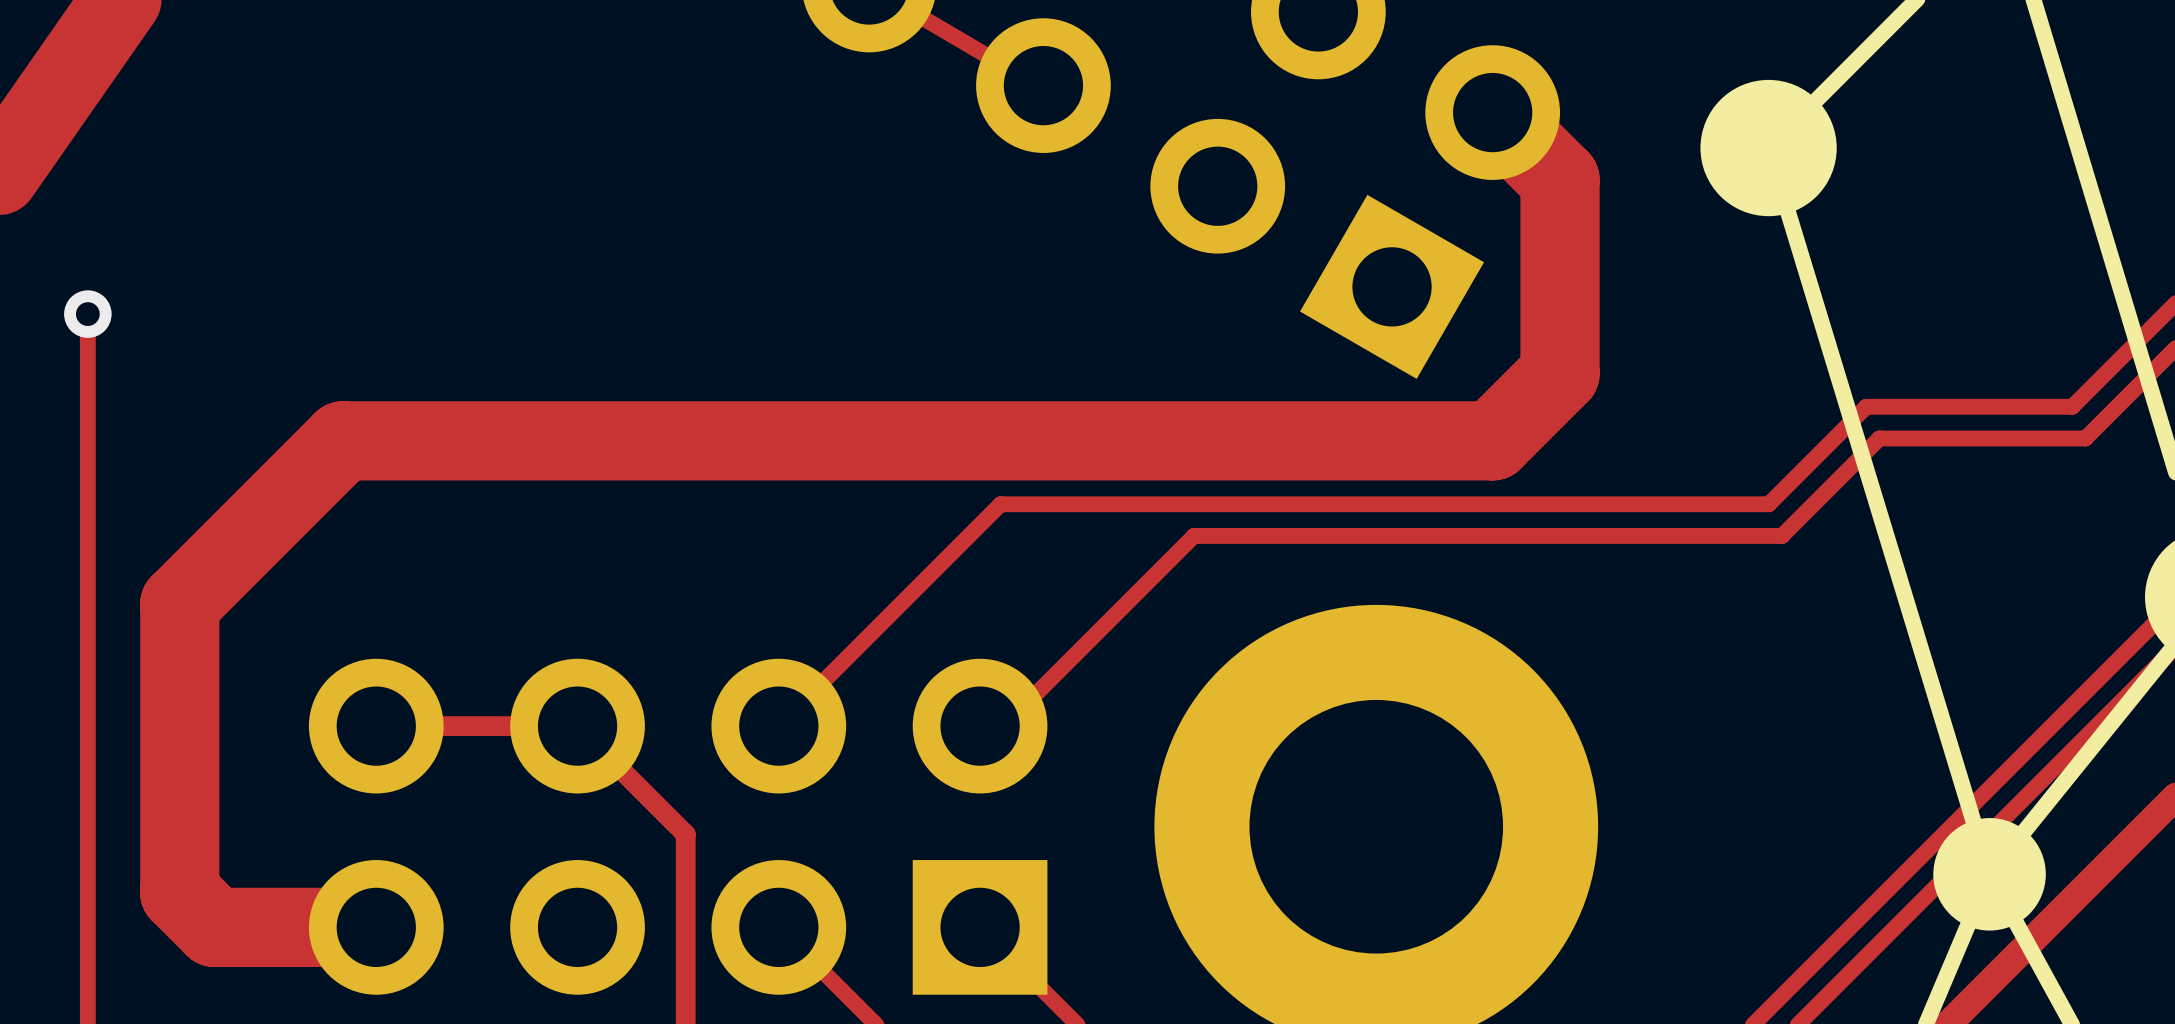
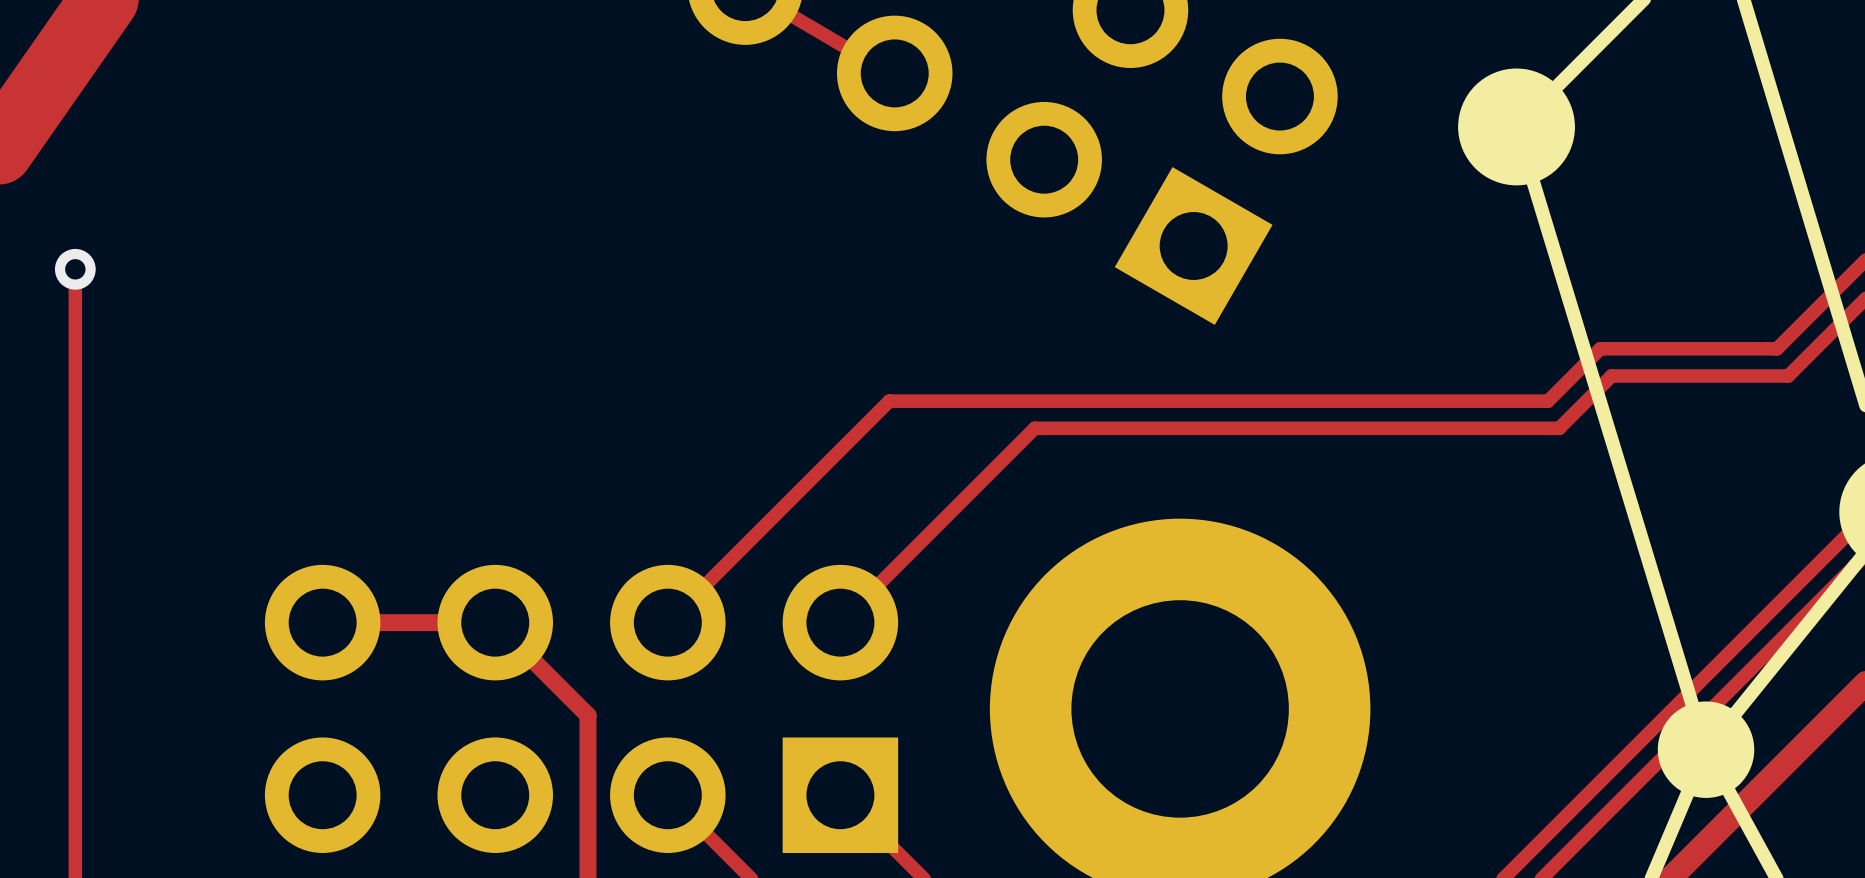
track: (1492, 112) (1560, 179) (1560, 373) (1492, 440) (343, 440) (179, 604) (179, 892) (214, 927) (376, 927) -> none
track: (1805, 467) (1768, 504) (1000, 504) -> (1548, 401) (889, 401) (858, 432)
track: (1818, 499) (1781, 535) (1194, 535) (1003, 726) (980, 726) -> (1559, 428) (1034, 428) (840, 622)

